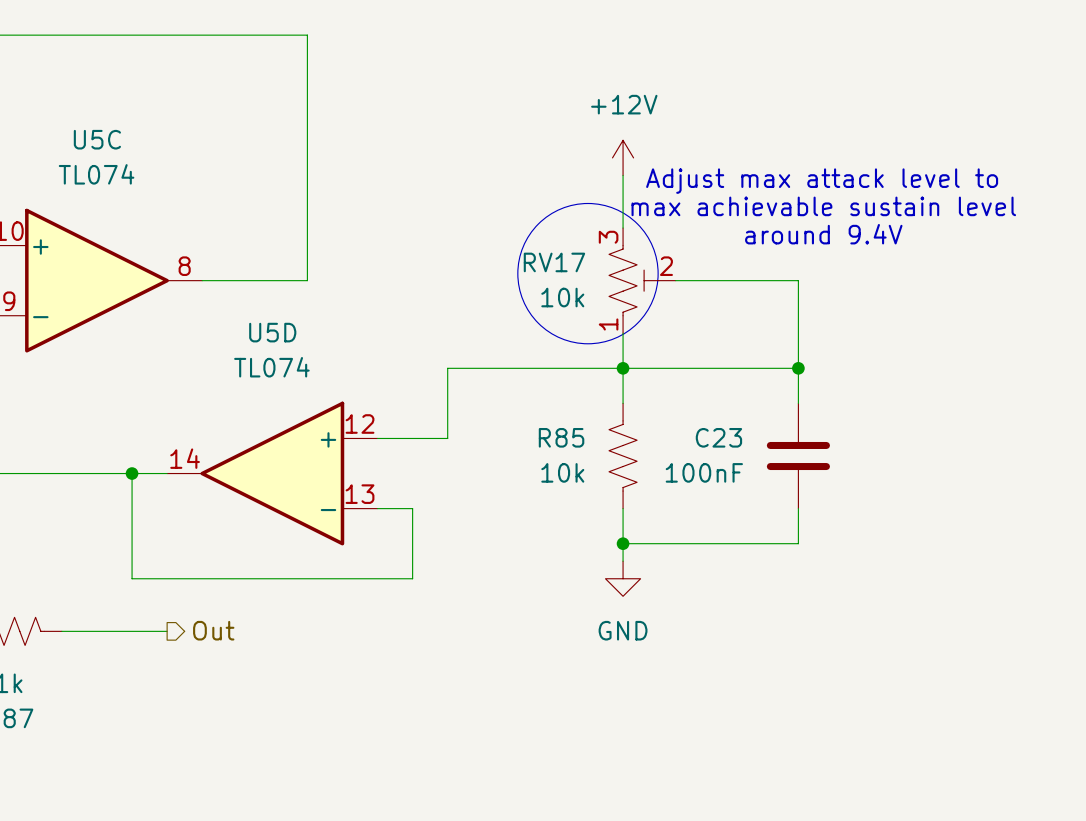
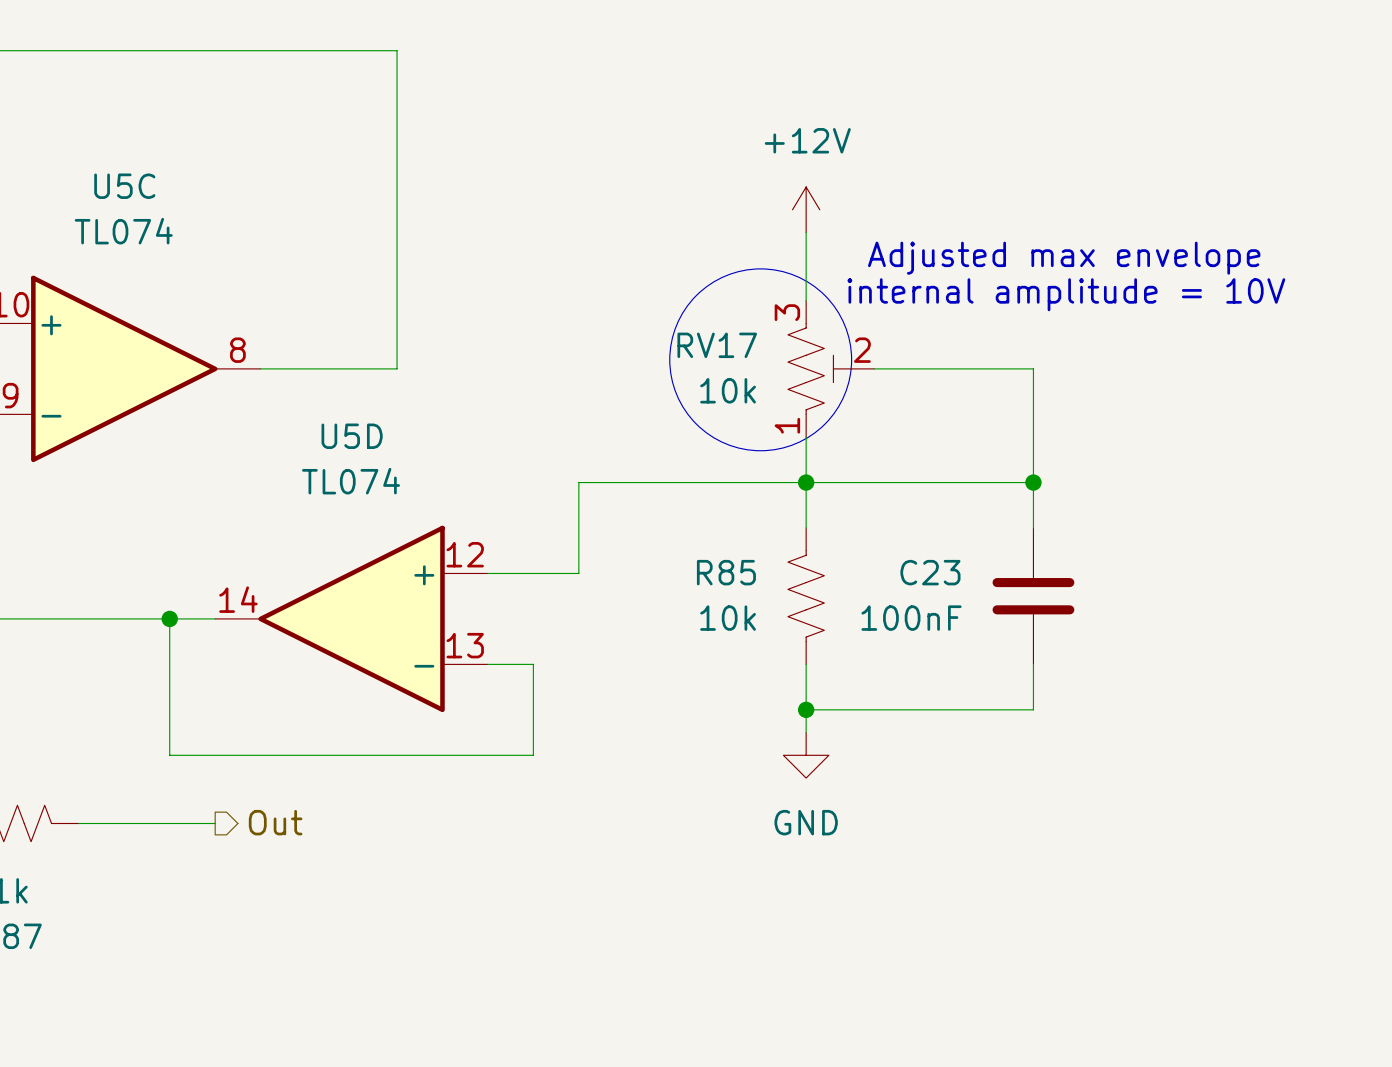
text: Adjust max attack level to (822, 181) -> Adjusted max envelope (1064, 258)
text: max achievable sustain level (823, 206) -> none
text: none -> internal amplitude = 10V (1066, 294)
text: around 9.4V (823, 234) -> none

